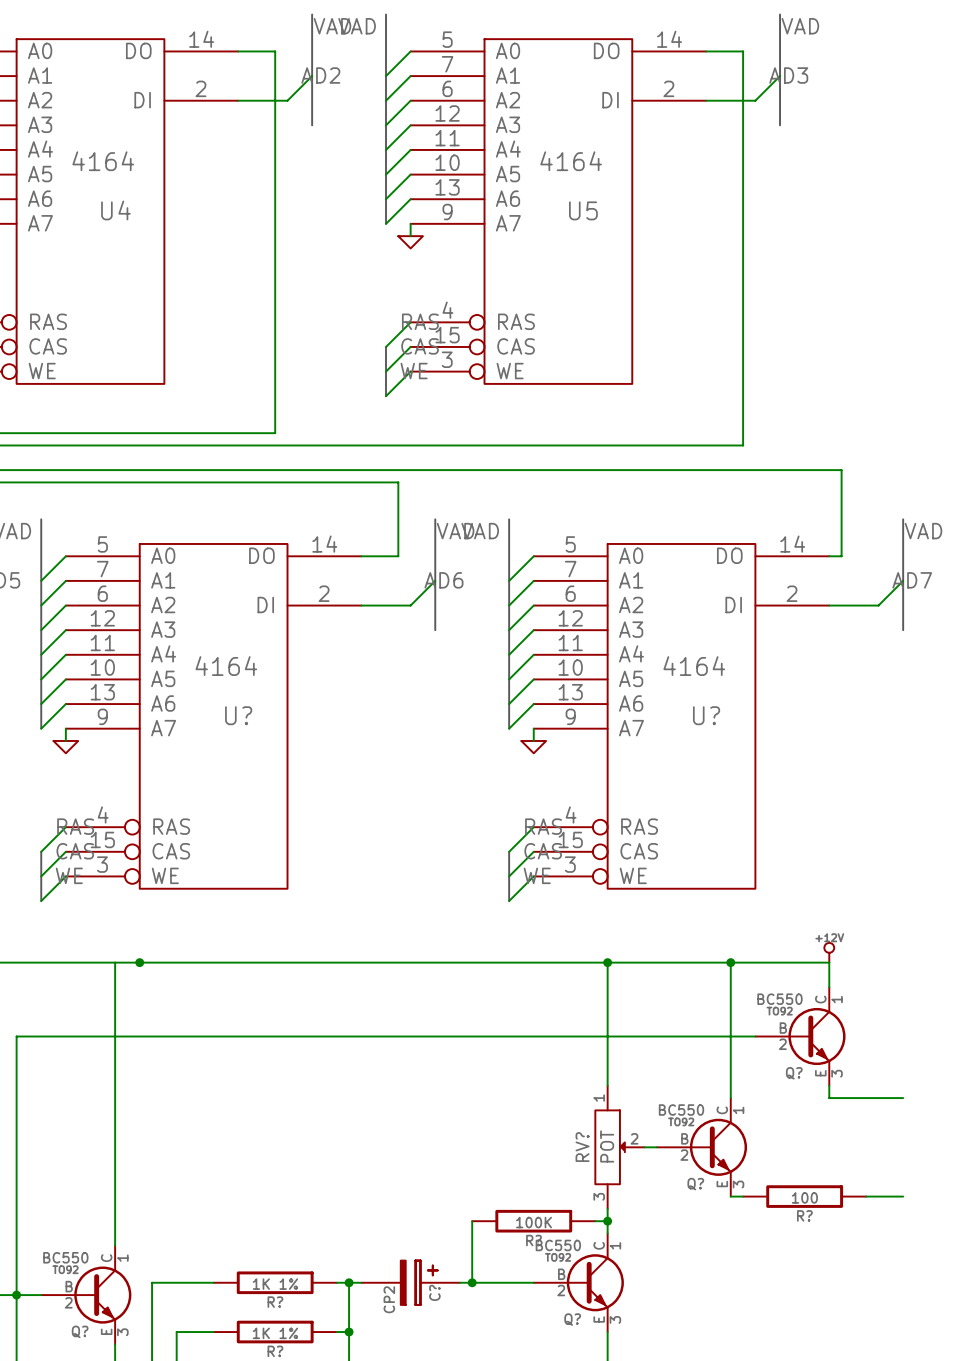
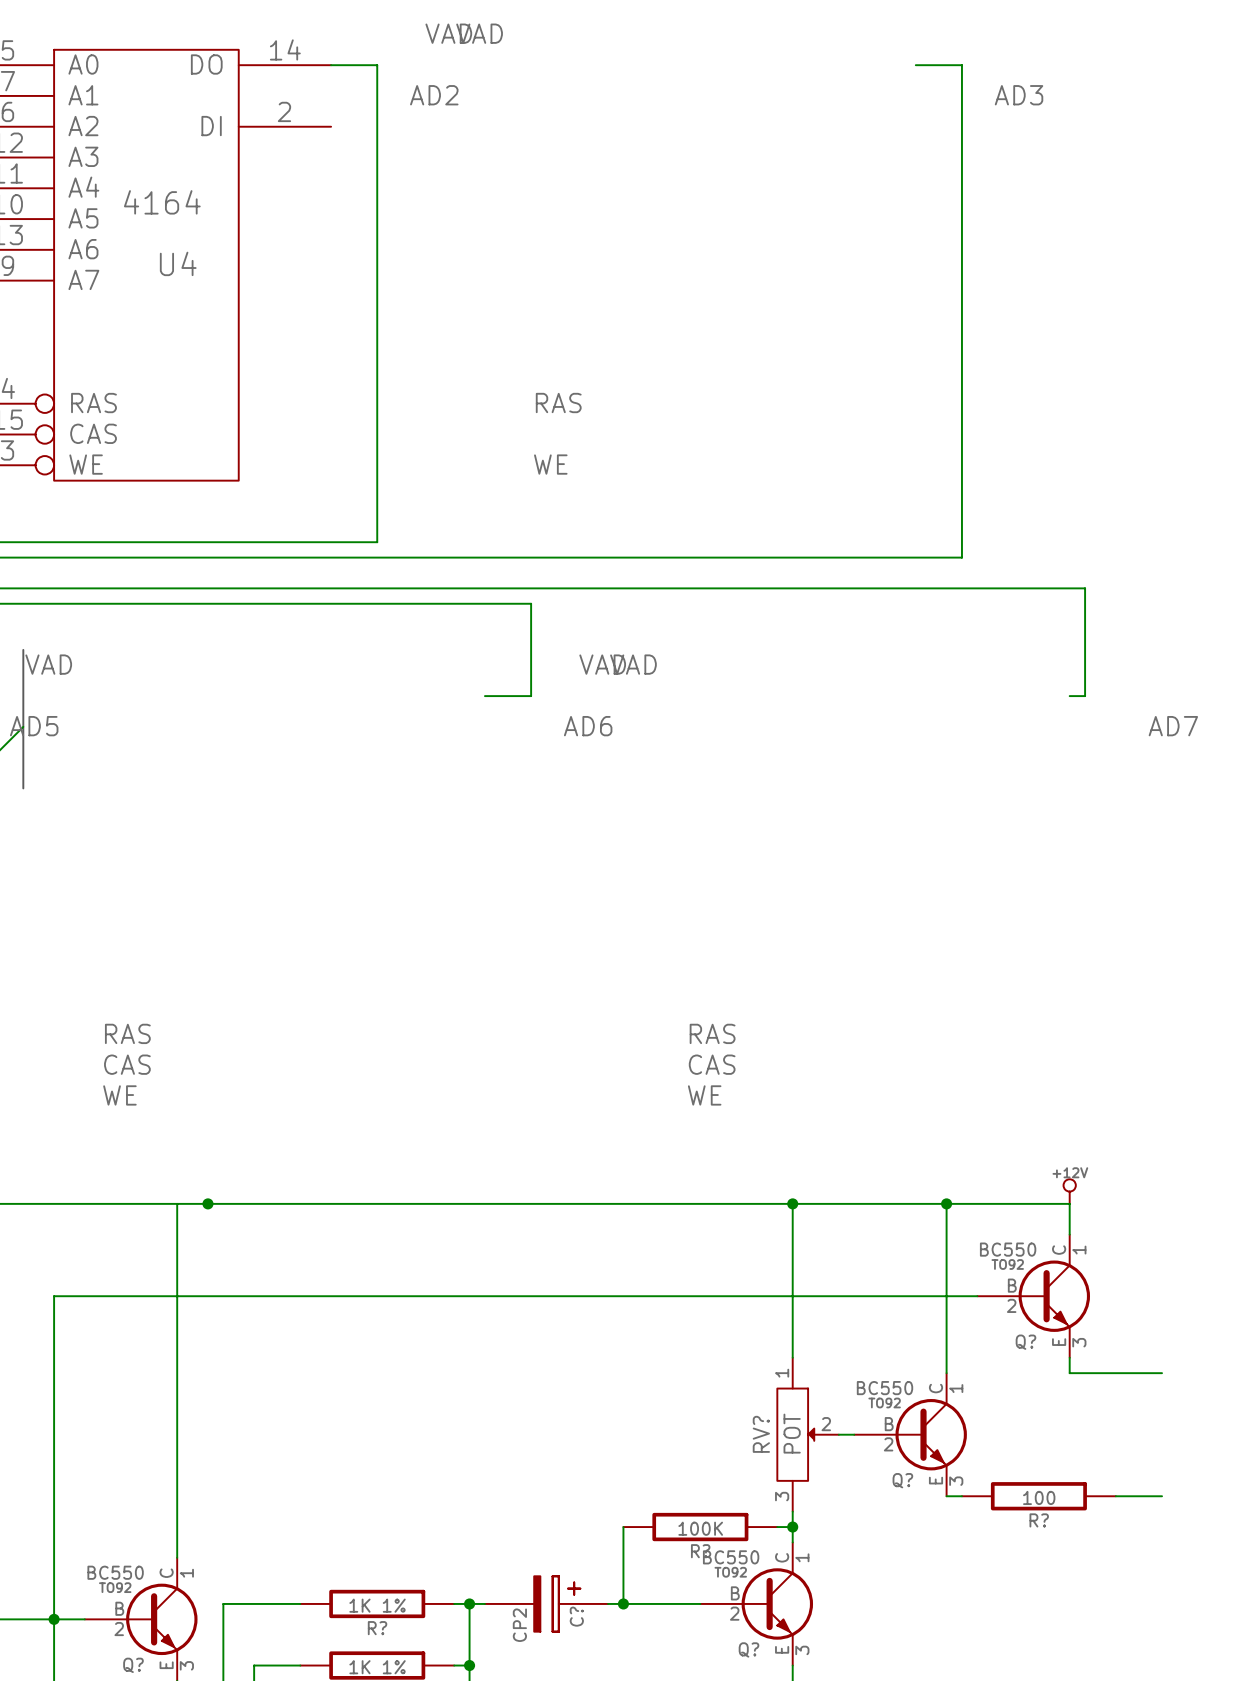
bus: (312, 14) (312, 125) -> none
bus: (386, 14) (386, 223) -> none
bus: (780, 14) (780, 125) -> none
label: VAD (800, 26) -> none
wire: (410, 51) (386, 76) -> none
wire: (312, 76) (287, 100) (238, 100) -> none
wire: (410, 76) (386, 100) -> none
wire: (780, 76) (755, 100) (706, 100) -> none
wire: (410, 100) (386, 125) -> none
wire: (410, 125) (386, 149) -> none
wire: (410, 149) (386, 174) -> none
wire: (410, 174) (386, 199) -> none
wire: (410, 199) (386, 223) -> none
U5: 4164 (558, 211) -> none
wire: (410, 223) (410, 236) -> none
power symbol: (410, 242) -> none
wire: (410, 322) (386, 346) -> none
bus: (386, 346) (386, 396) -> none
wire: (410, 346) (386, 371) -> none
label: CAS (420, 346) -> none
wire: (410, 371) (386, 396) -> none
bus: (41, 519) (41, 728) -> none
bus: (435, 519) (435, 630) -> none
bus: (509, 519) (509, 728) -> none
bus: (903, 519) (903, 630) -> none
label: VAD (923, 531) -> none
wire: (65, 556) (41, 580) -> none
wire: (533, 556) (509, 580) -> none
wire: (65, 580) (41, 605) -> none
wire: (435, 580) (410, 605) (361, 605) -> none
wire: (533, 580) (509, 605) -> none
wire: (903, 580) (878, 605) (829, 605) -> none
wire: (65, 605) (41, 630) -> none
wire: (533, 605) (509, 630) -> none
wire: (65, 630) (41, 654) -> none
wire: (533, 630) (509, 654) -> none
wire: (65, 654) (41, 679) -> none
wire: (533, 654) (509, 679) -> none
wire: (65, 679) (41, 704) -> none
wire: (533, 679) (509, 704) -> none
wire: (65, 704) (41, 728) -> none
wire: (533, 704) (509, 728) -> none
U?: 4164 (213, 716) -> none
U?: 4164 (681, 716) -> none
wire: (65, 728) (65, 740) -> none
wire: (533, 728) (533, 740) -> none
power symbol: (65, 747) -> none
power symbol: (533, 747) -> none
wire: (65, 827) (41, 851) -> none
wire: (533, 827) (509, 851) -> none
bus: (41, 851) (41, 901) -> none
wire: (65, 851) (41, 876) -> none
bus: (509, 851) (509, 901) -> none
wire: (533, 851) (509, 876) -> none
wire: (65, 876) (41, 901) -> none
wire: (533, 876) (509, 901) -> none

